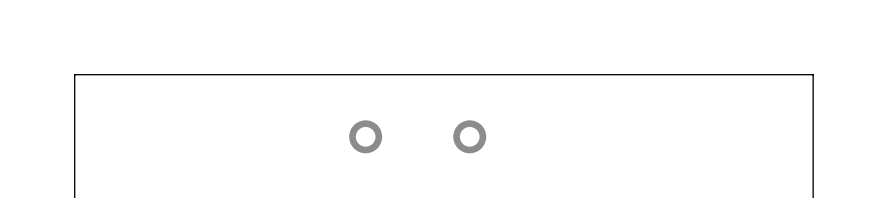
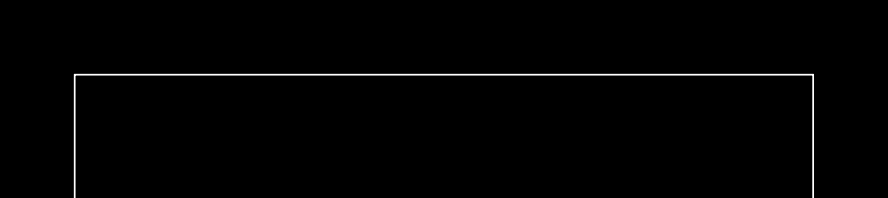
via: (365, 136) -> none
via: (469, 136) -> none

